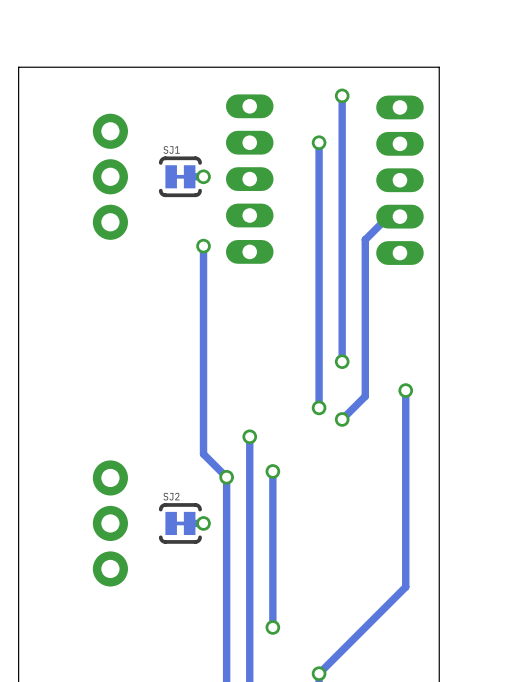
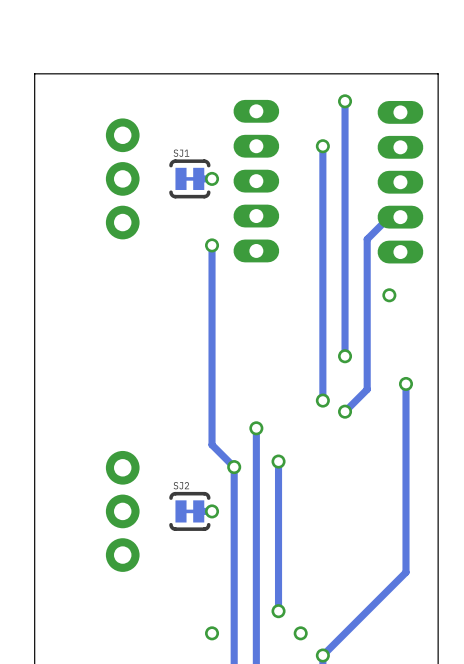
via: none -> (389, 295)
via: none -> (212, 633)
via: none -> (300, 633)

